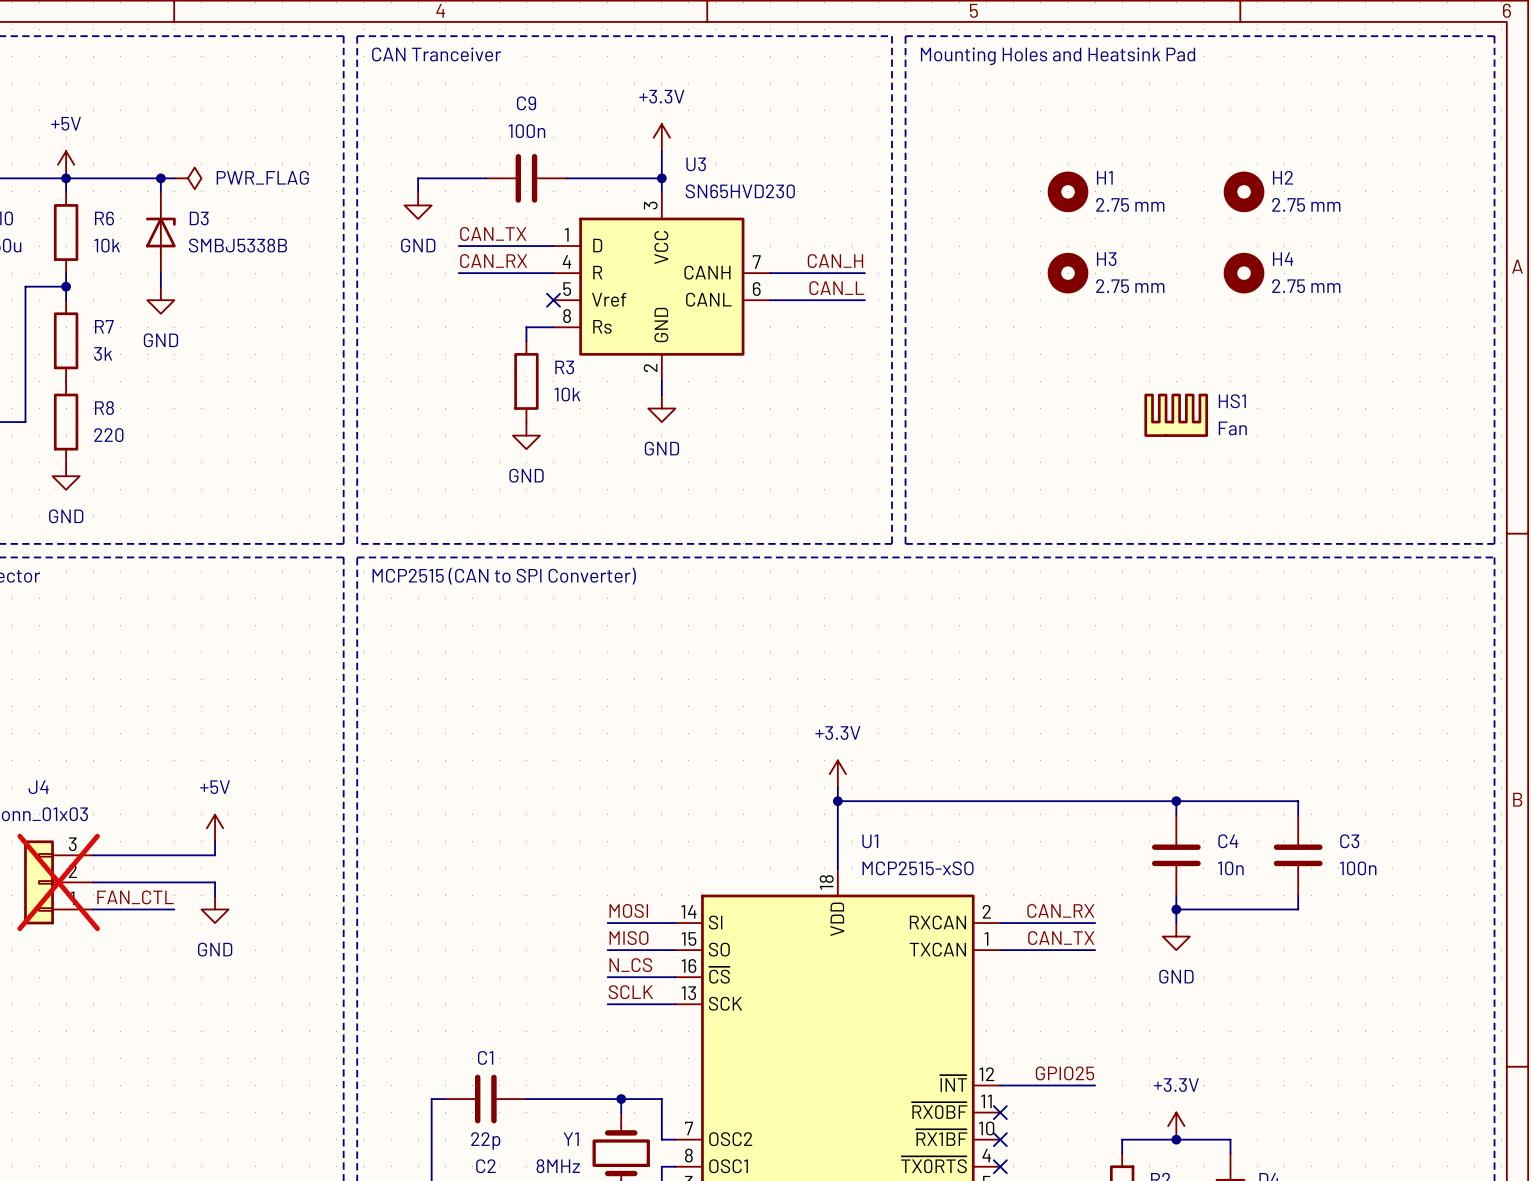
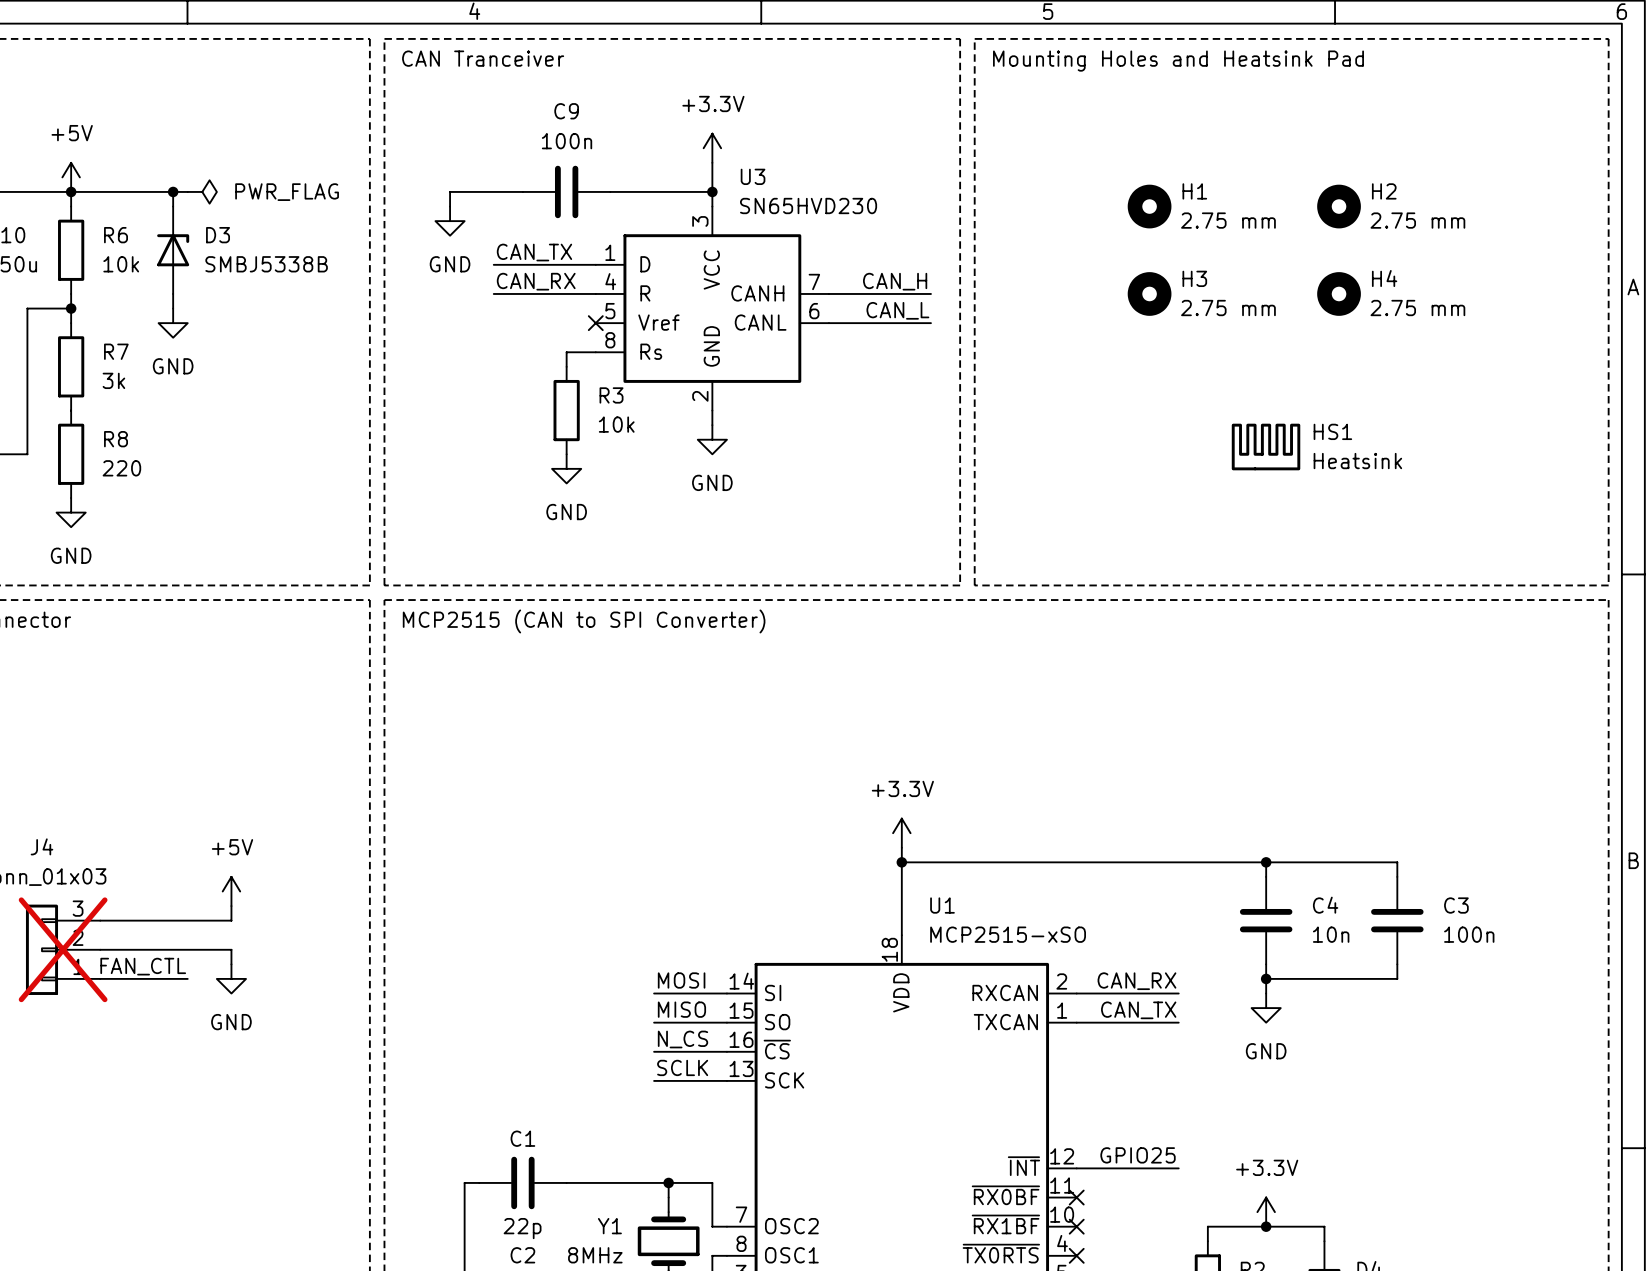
HS1 value: Fan (1232, 428) -> Heatsink (1357, 461)

